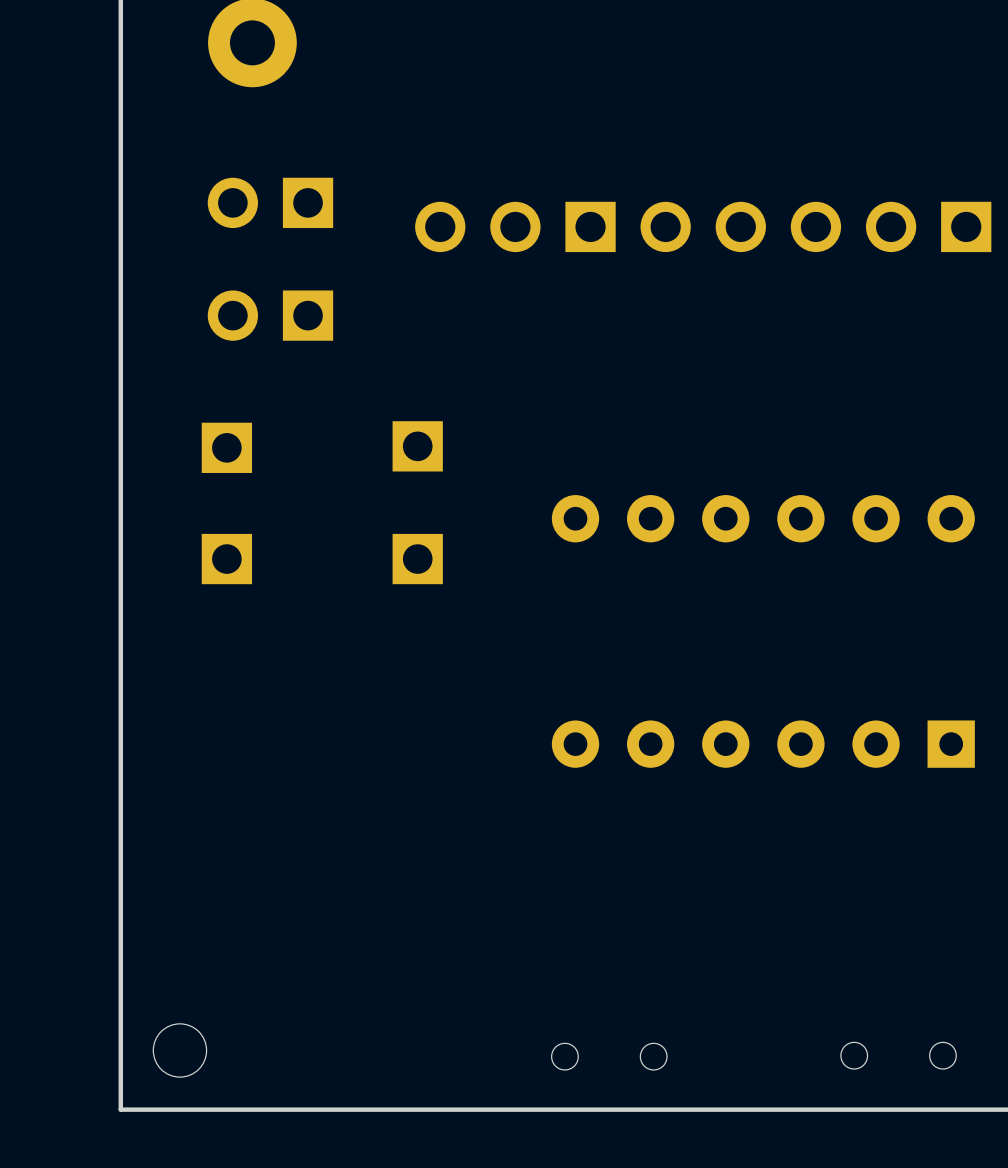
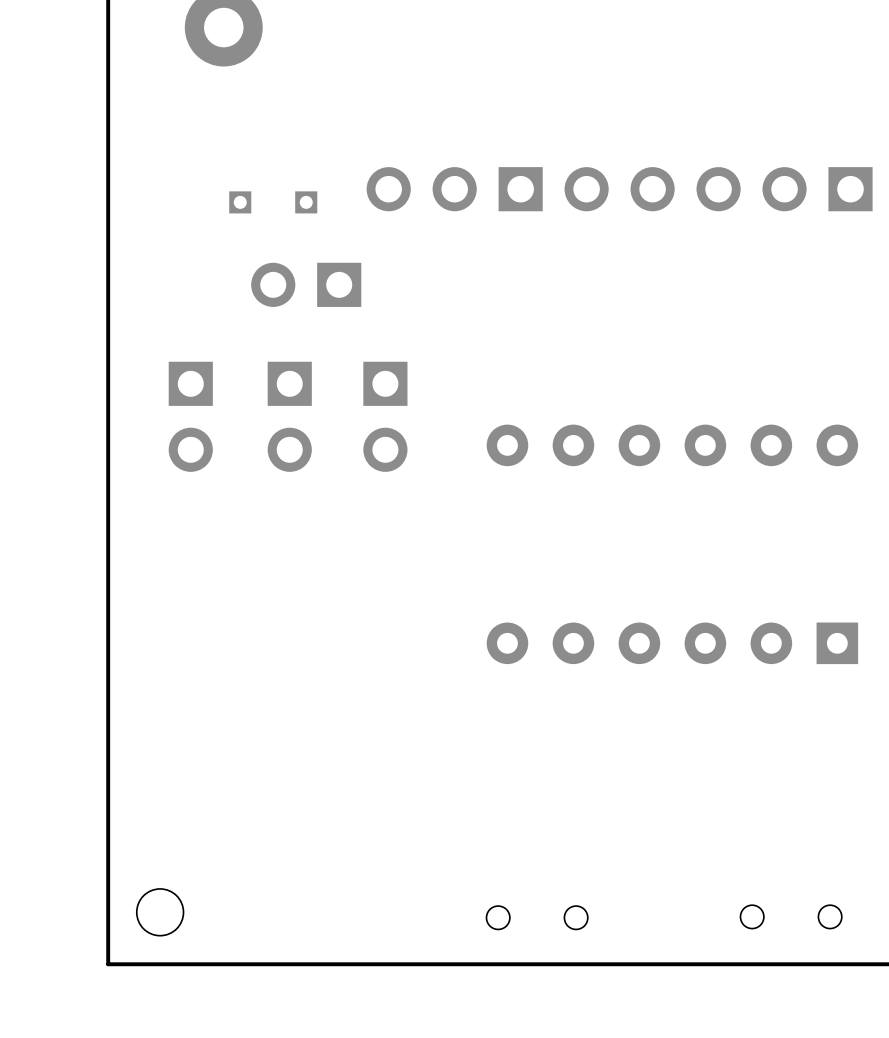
part: (270, 202) -> none
part: none -> (240, 202)
part: none -> (306, 202)
part: (270, 315) -> none
part: none -> (306, 284)
part: (417, 446) -> none
part: (226, 447) -> none
part: none -> (190, 416)
part: none -> (289, 416)
part: none -> (385, 416)
part: (226, 559) -> none
part: (417, 559) -> none

